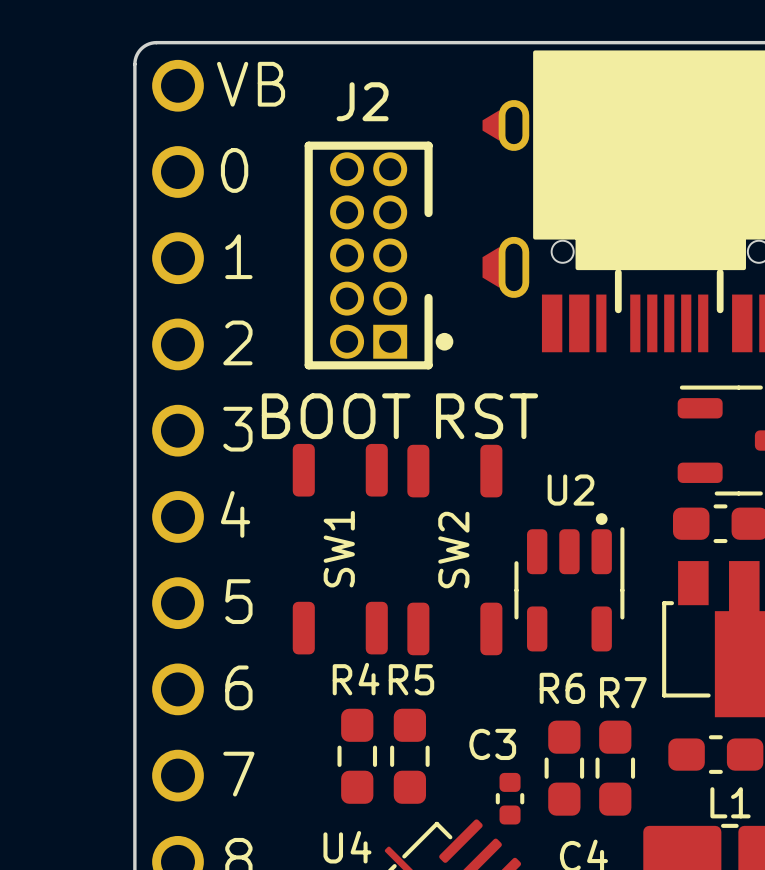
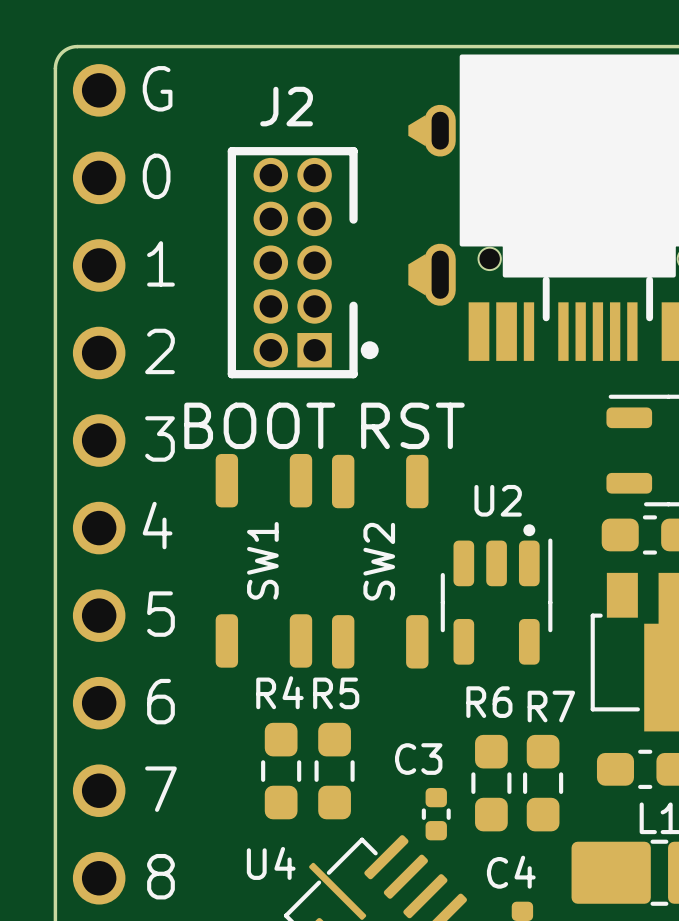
text: VB (251, 84) -> G (157, 88)

